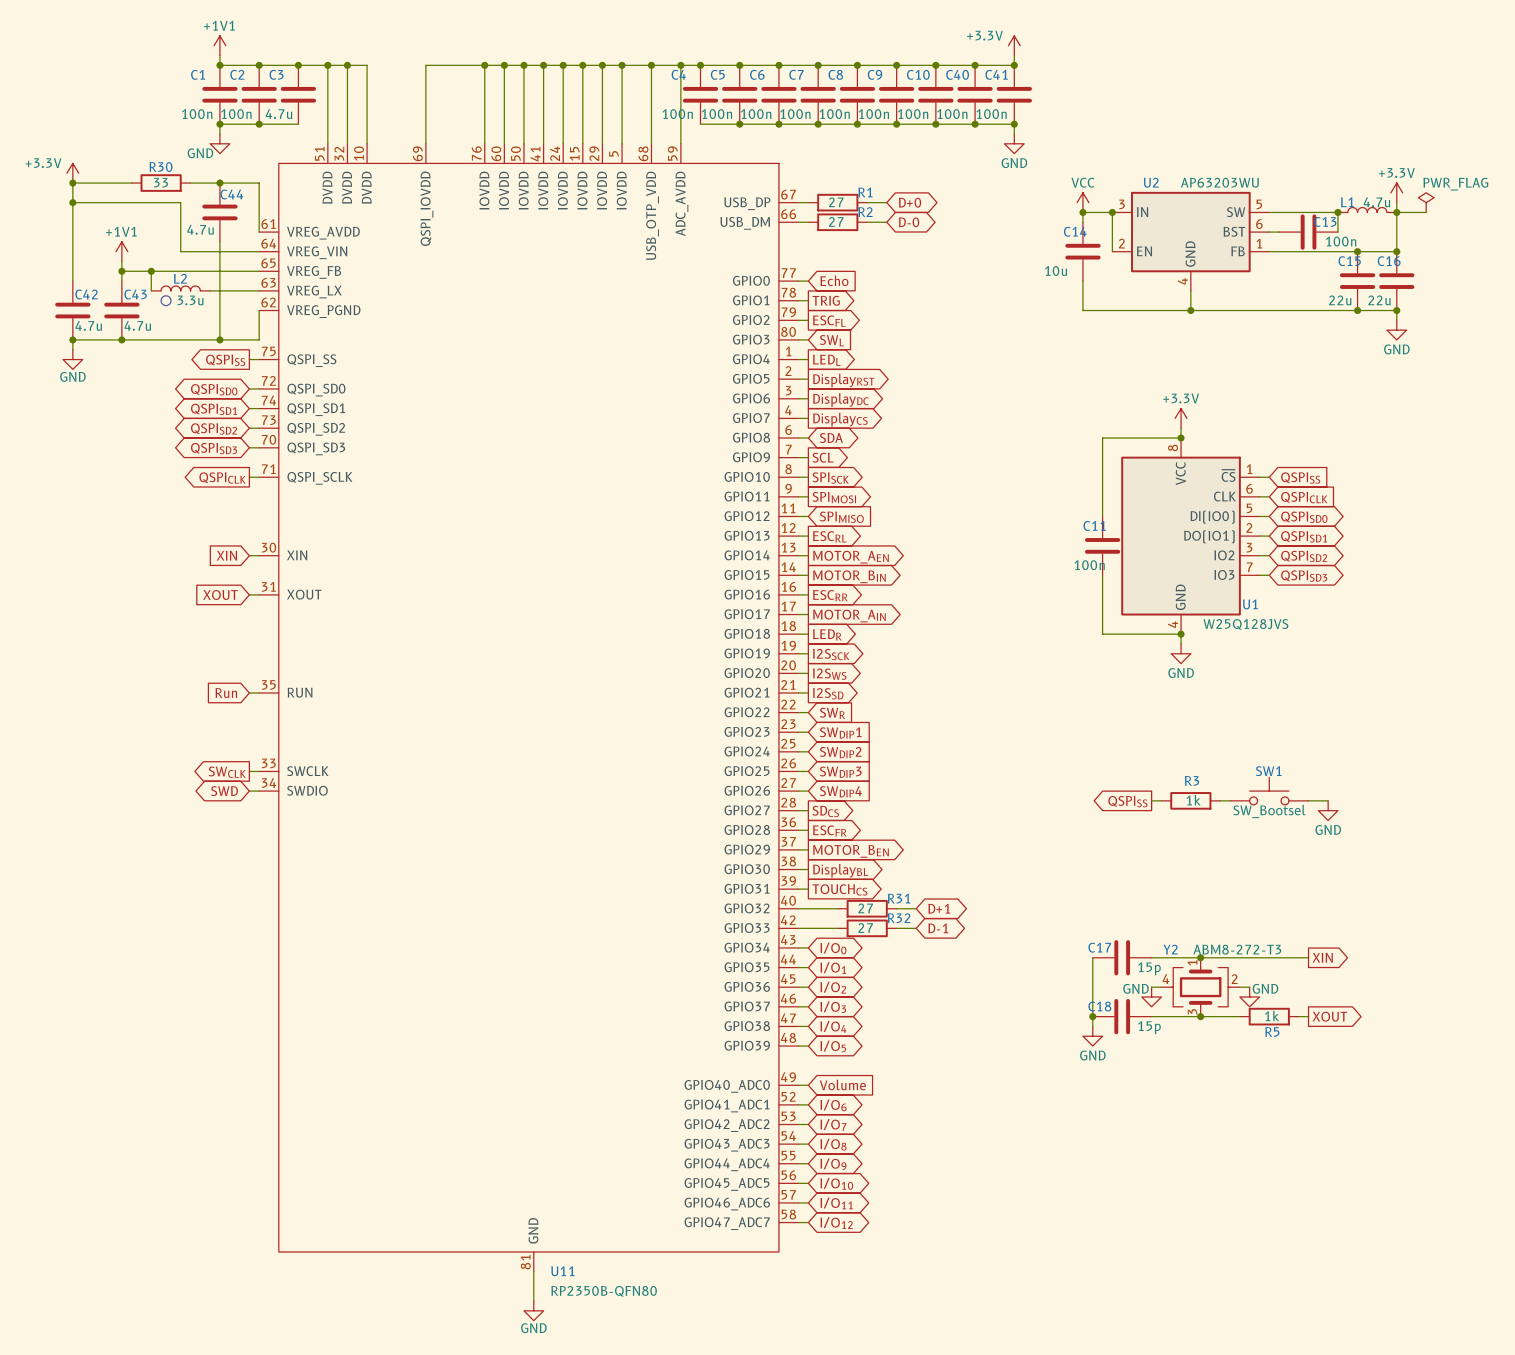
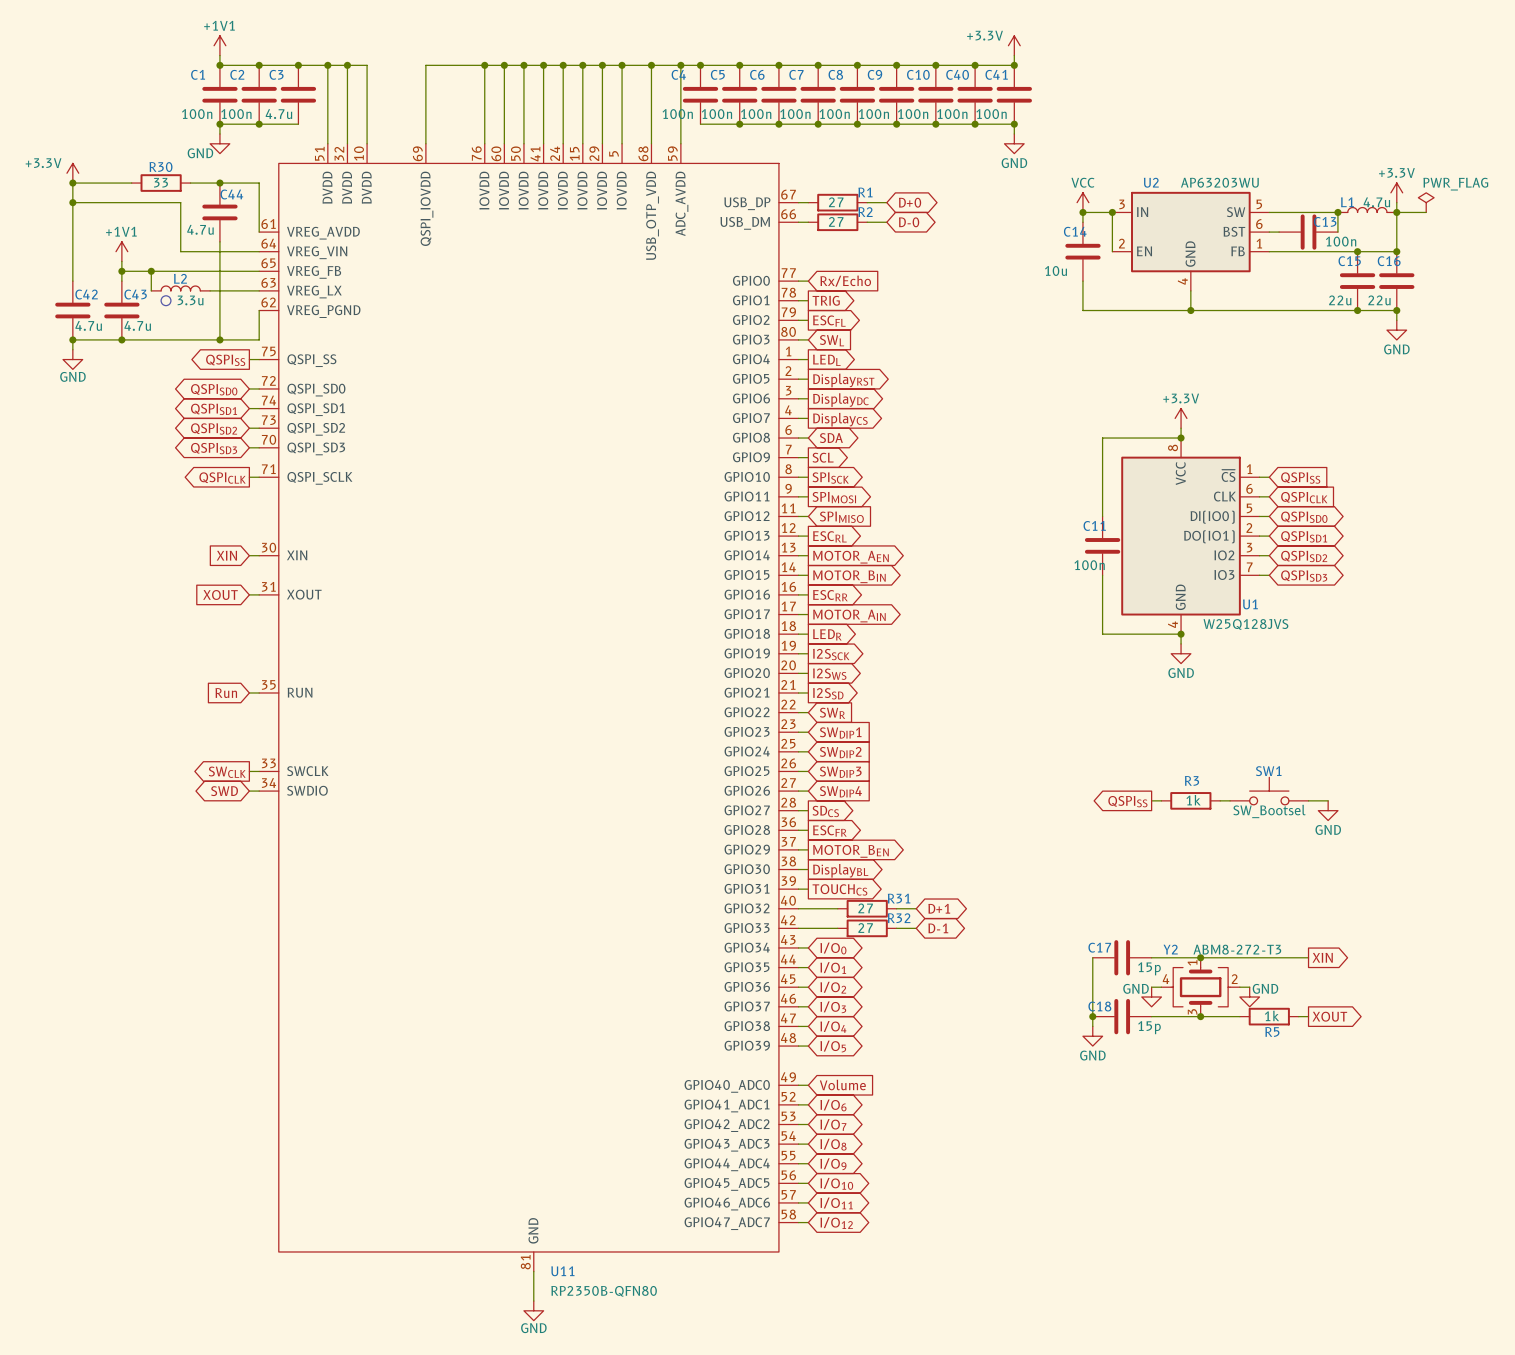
global label: Echo (834, 280) -> Rx/Echo (845, 281)

